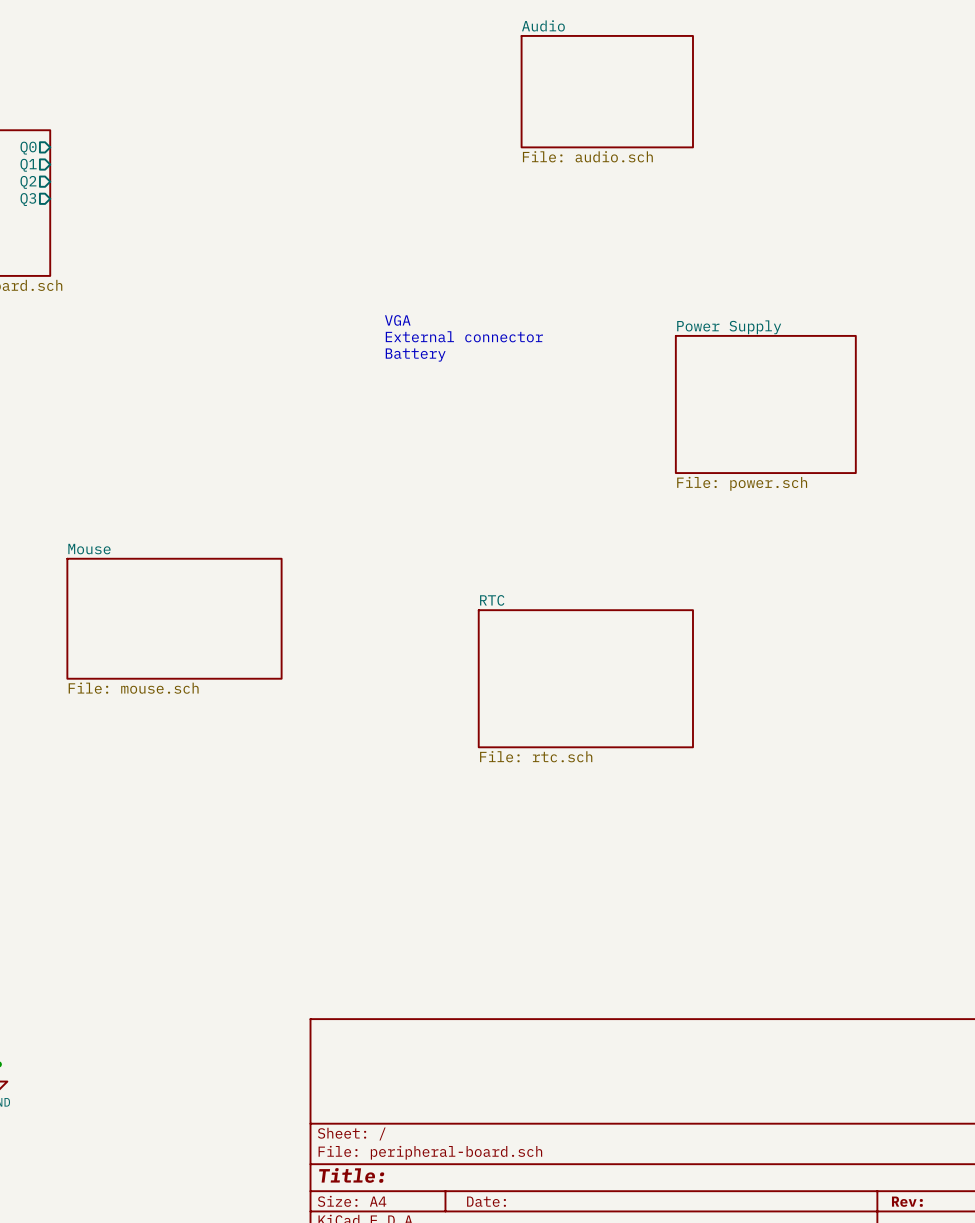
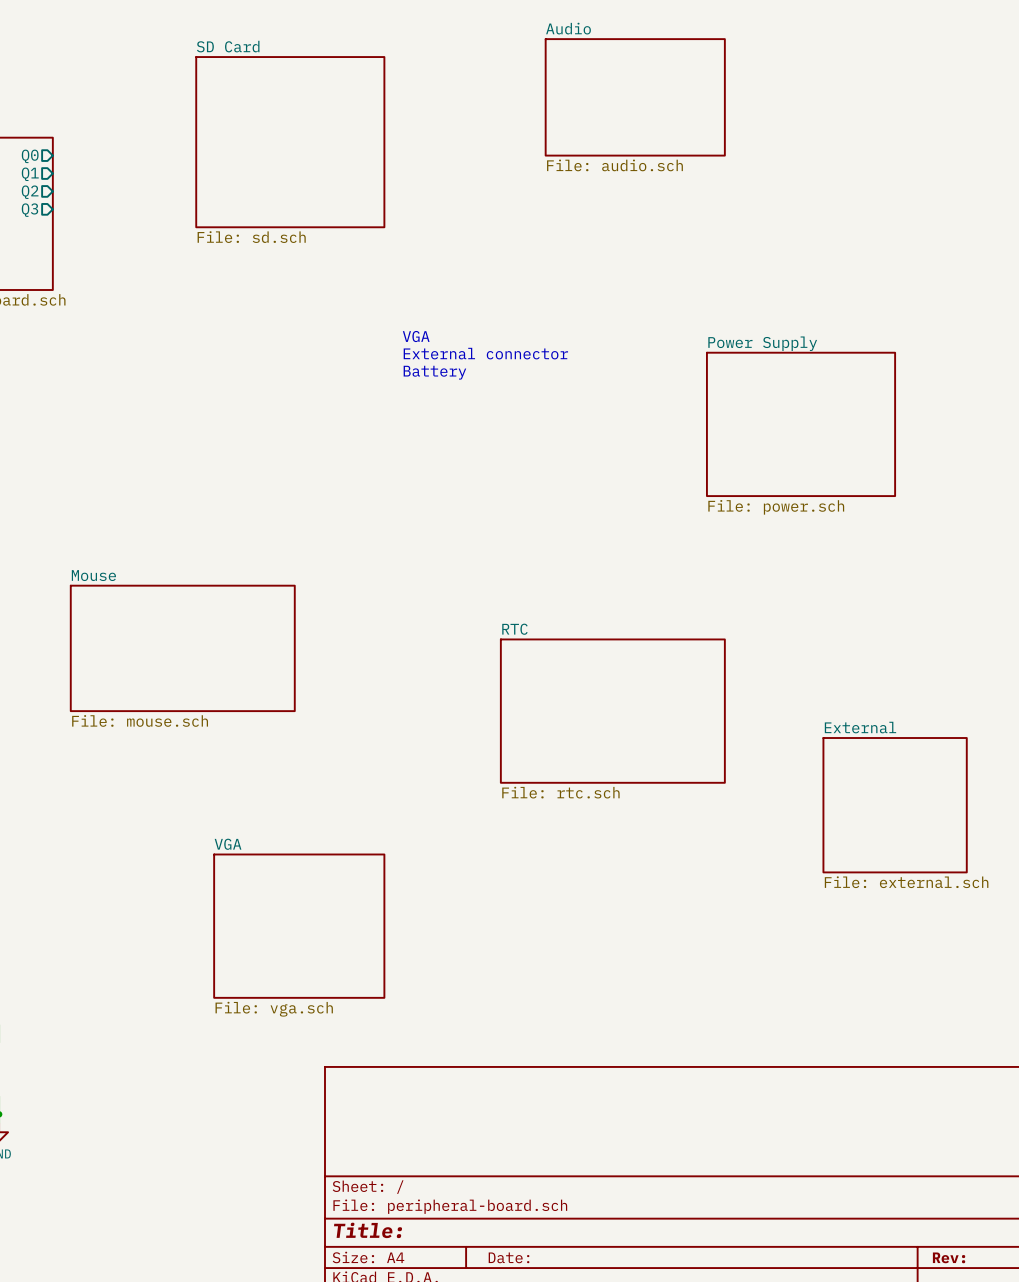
sheet SD Card: none -> File: sd.sch (290, 142)
sheet External: none -> File: external.sch (895, 805)
sheet VGA: none -> File: vga.sch (299, 926)

